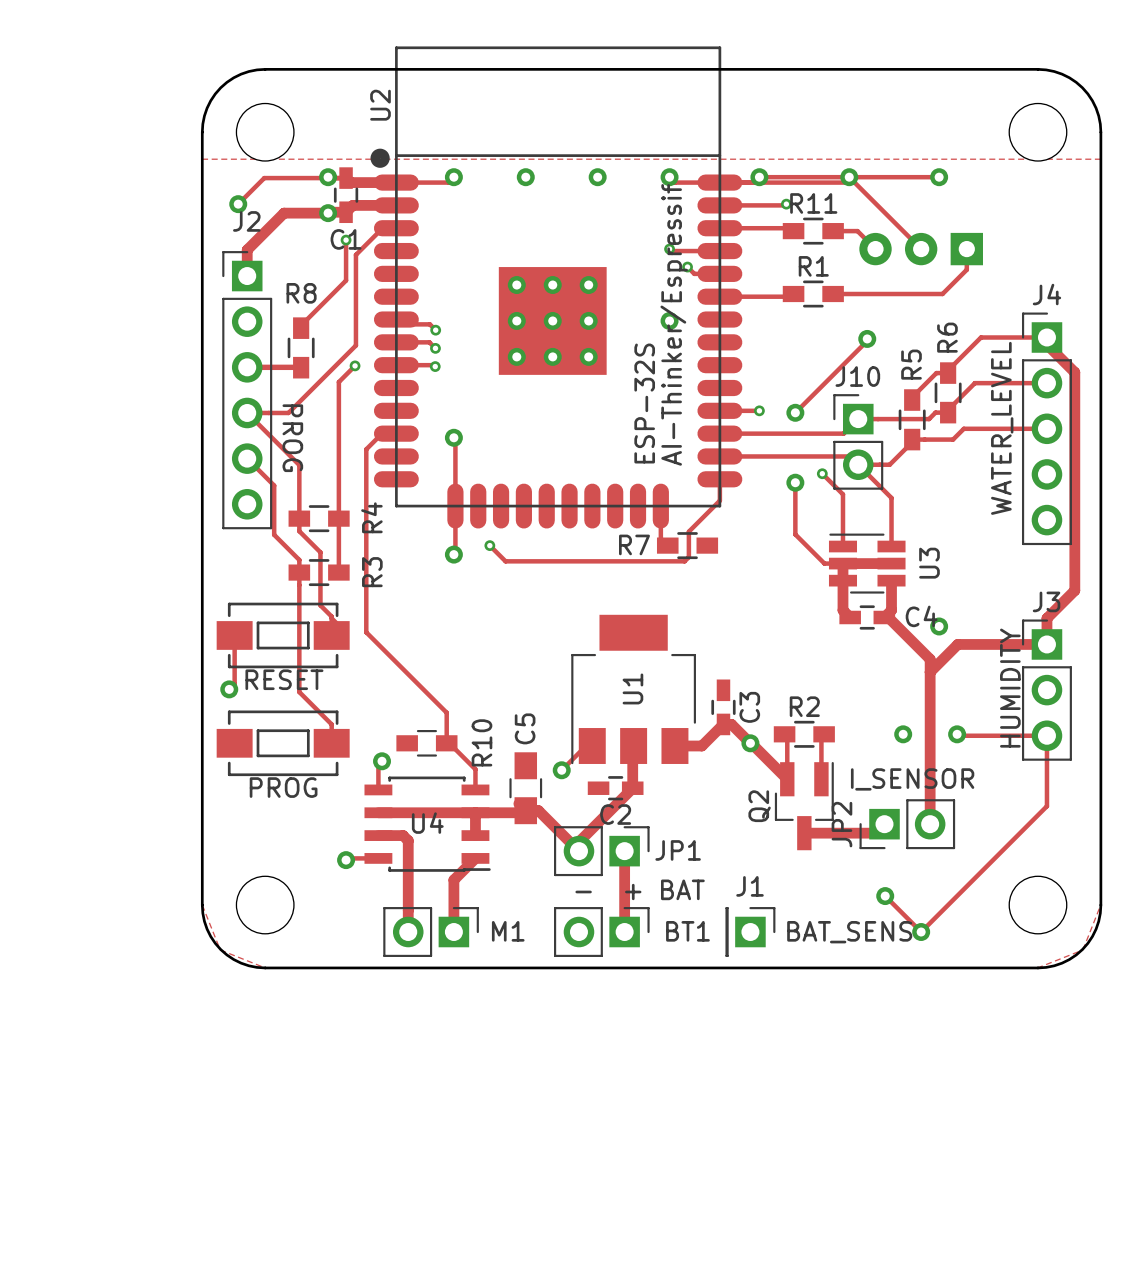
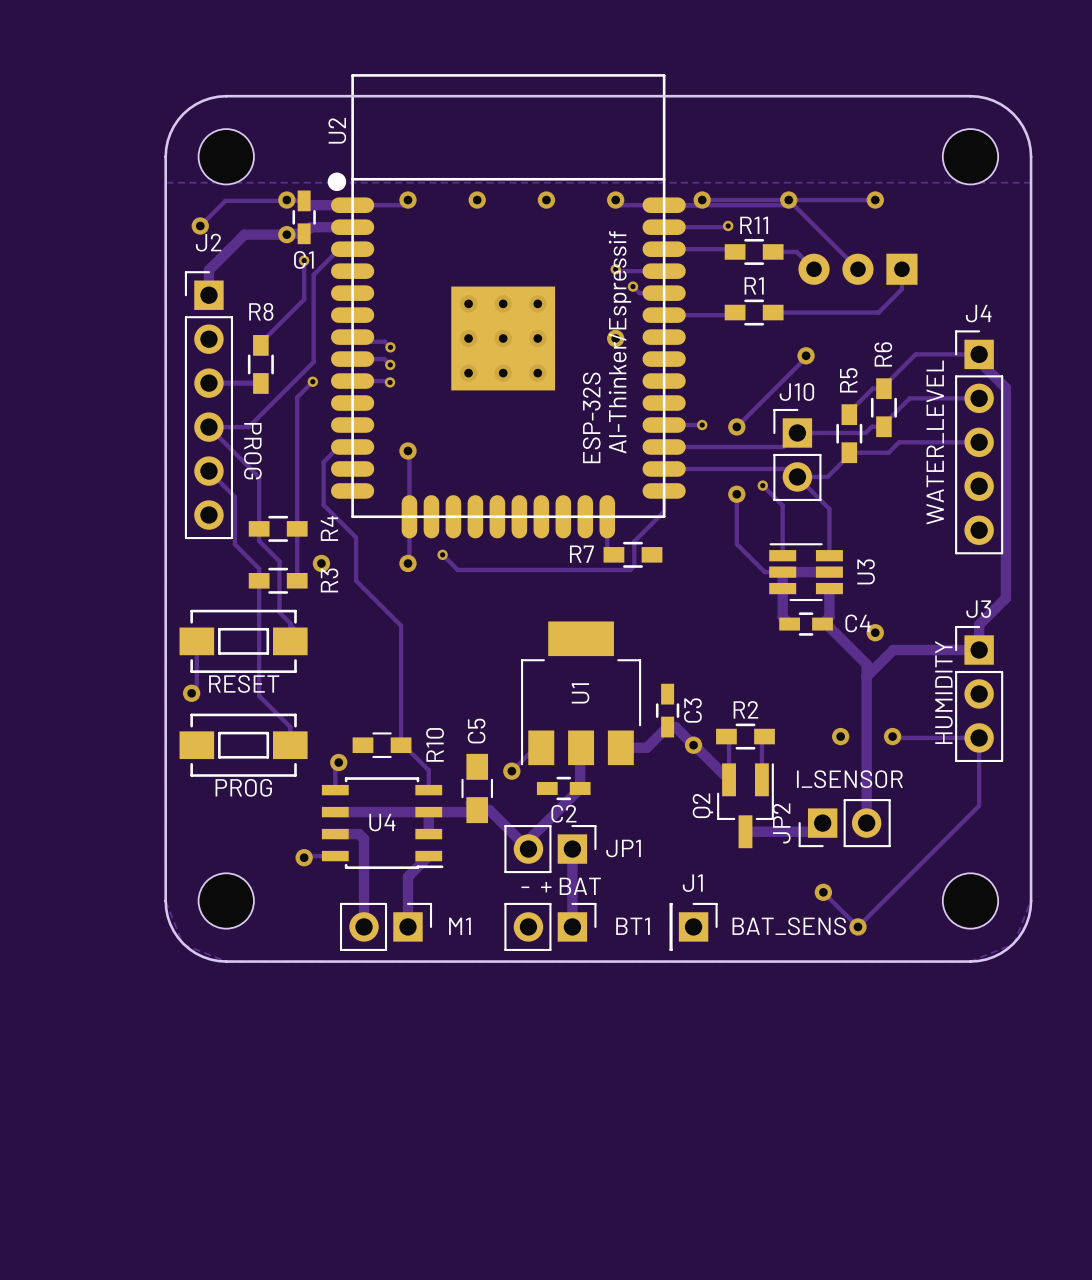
track: (366, 493) (366, 632) (446, 712) -> (323, 505) (356, 537) (356, 580) (401, 625) (401, 715)
via: none -> (321, 563)

